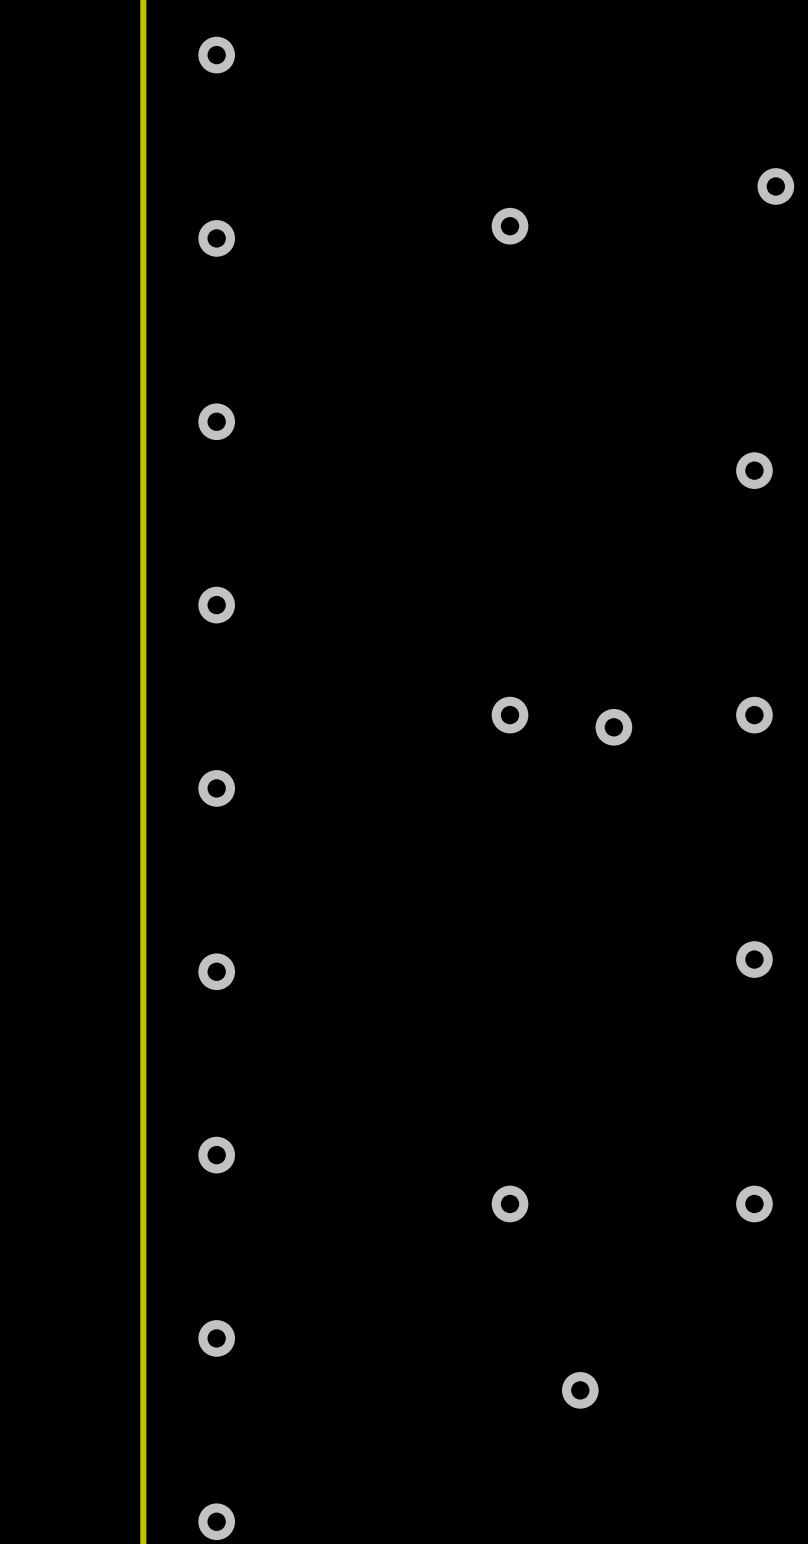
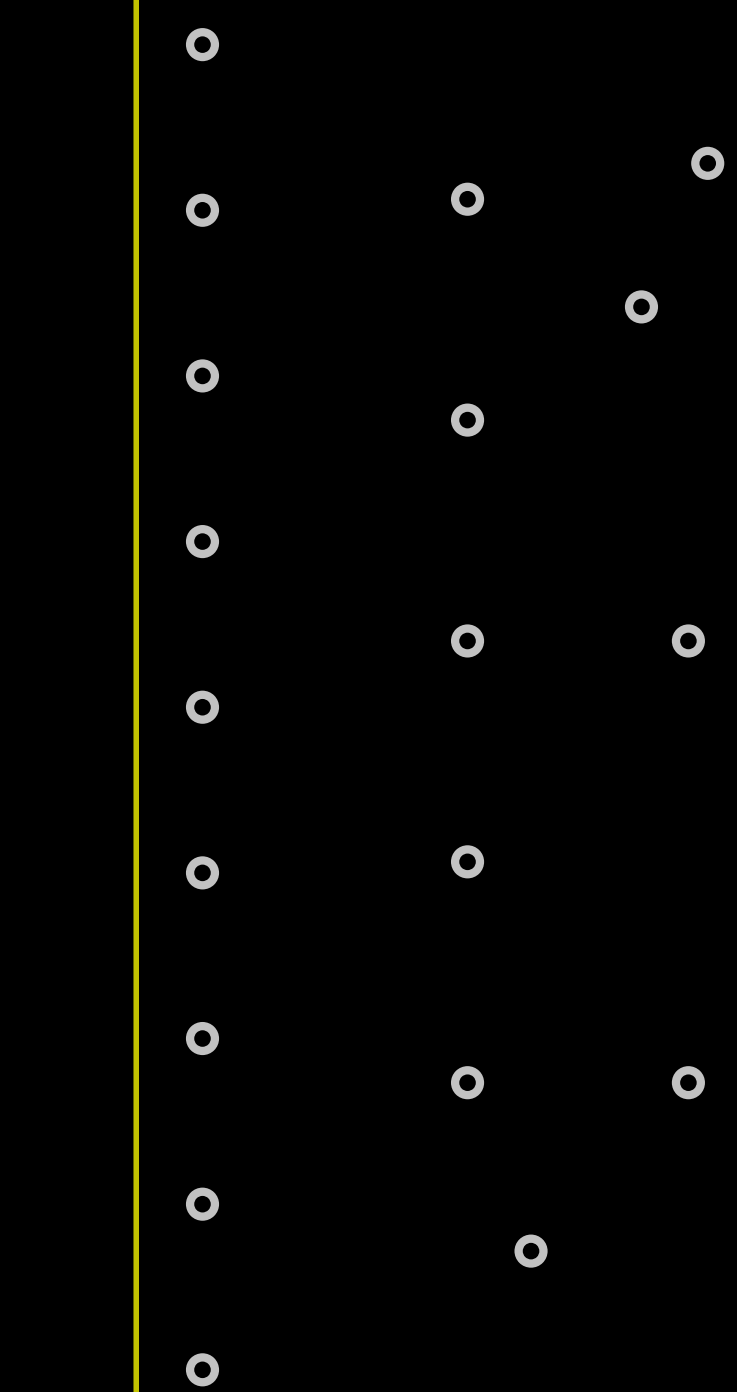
via: none -> (641, 306)
via: none -> (467, 420)
via: (754, 470) -> none
via: (613, 727) -> none
via: none -> (467, 861)
via: (754, 959) -> none

